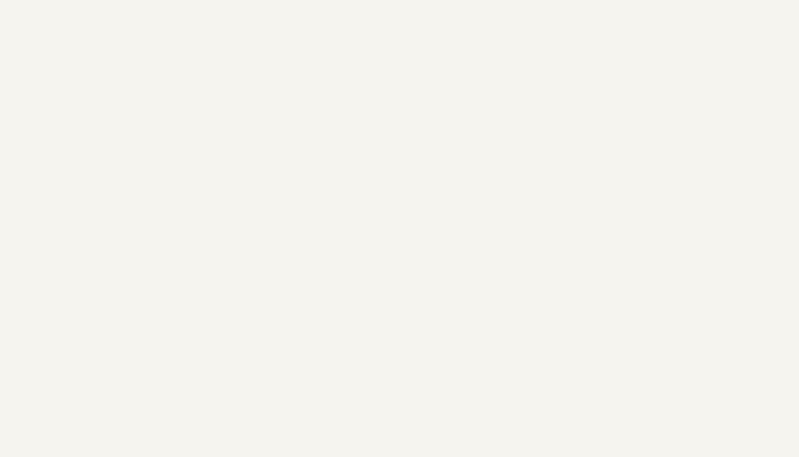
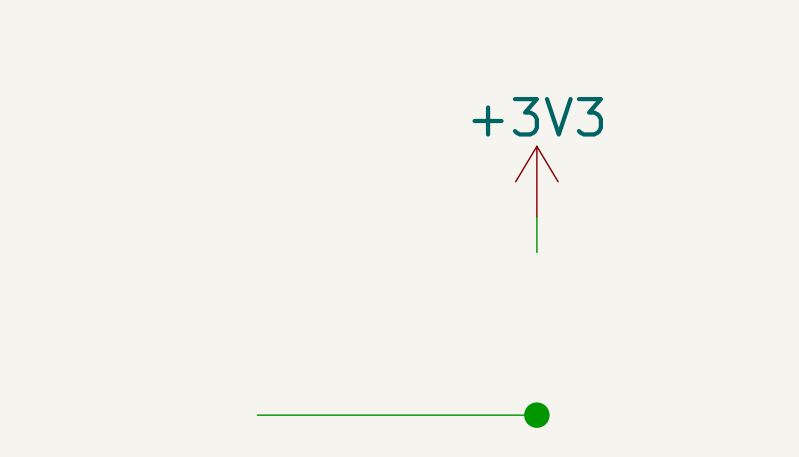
power symbol: none -> +3V3 (536, 181)
wire: none -> (536, 217) (536, 252)
wire: none -> (257, 415) (536, 415)
junction: none -> (536, 415)

